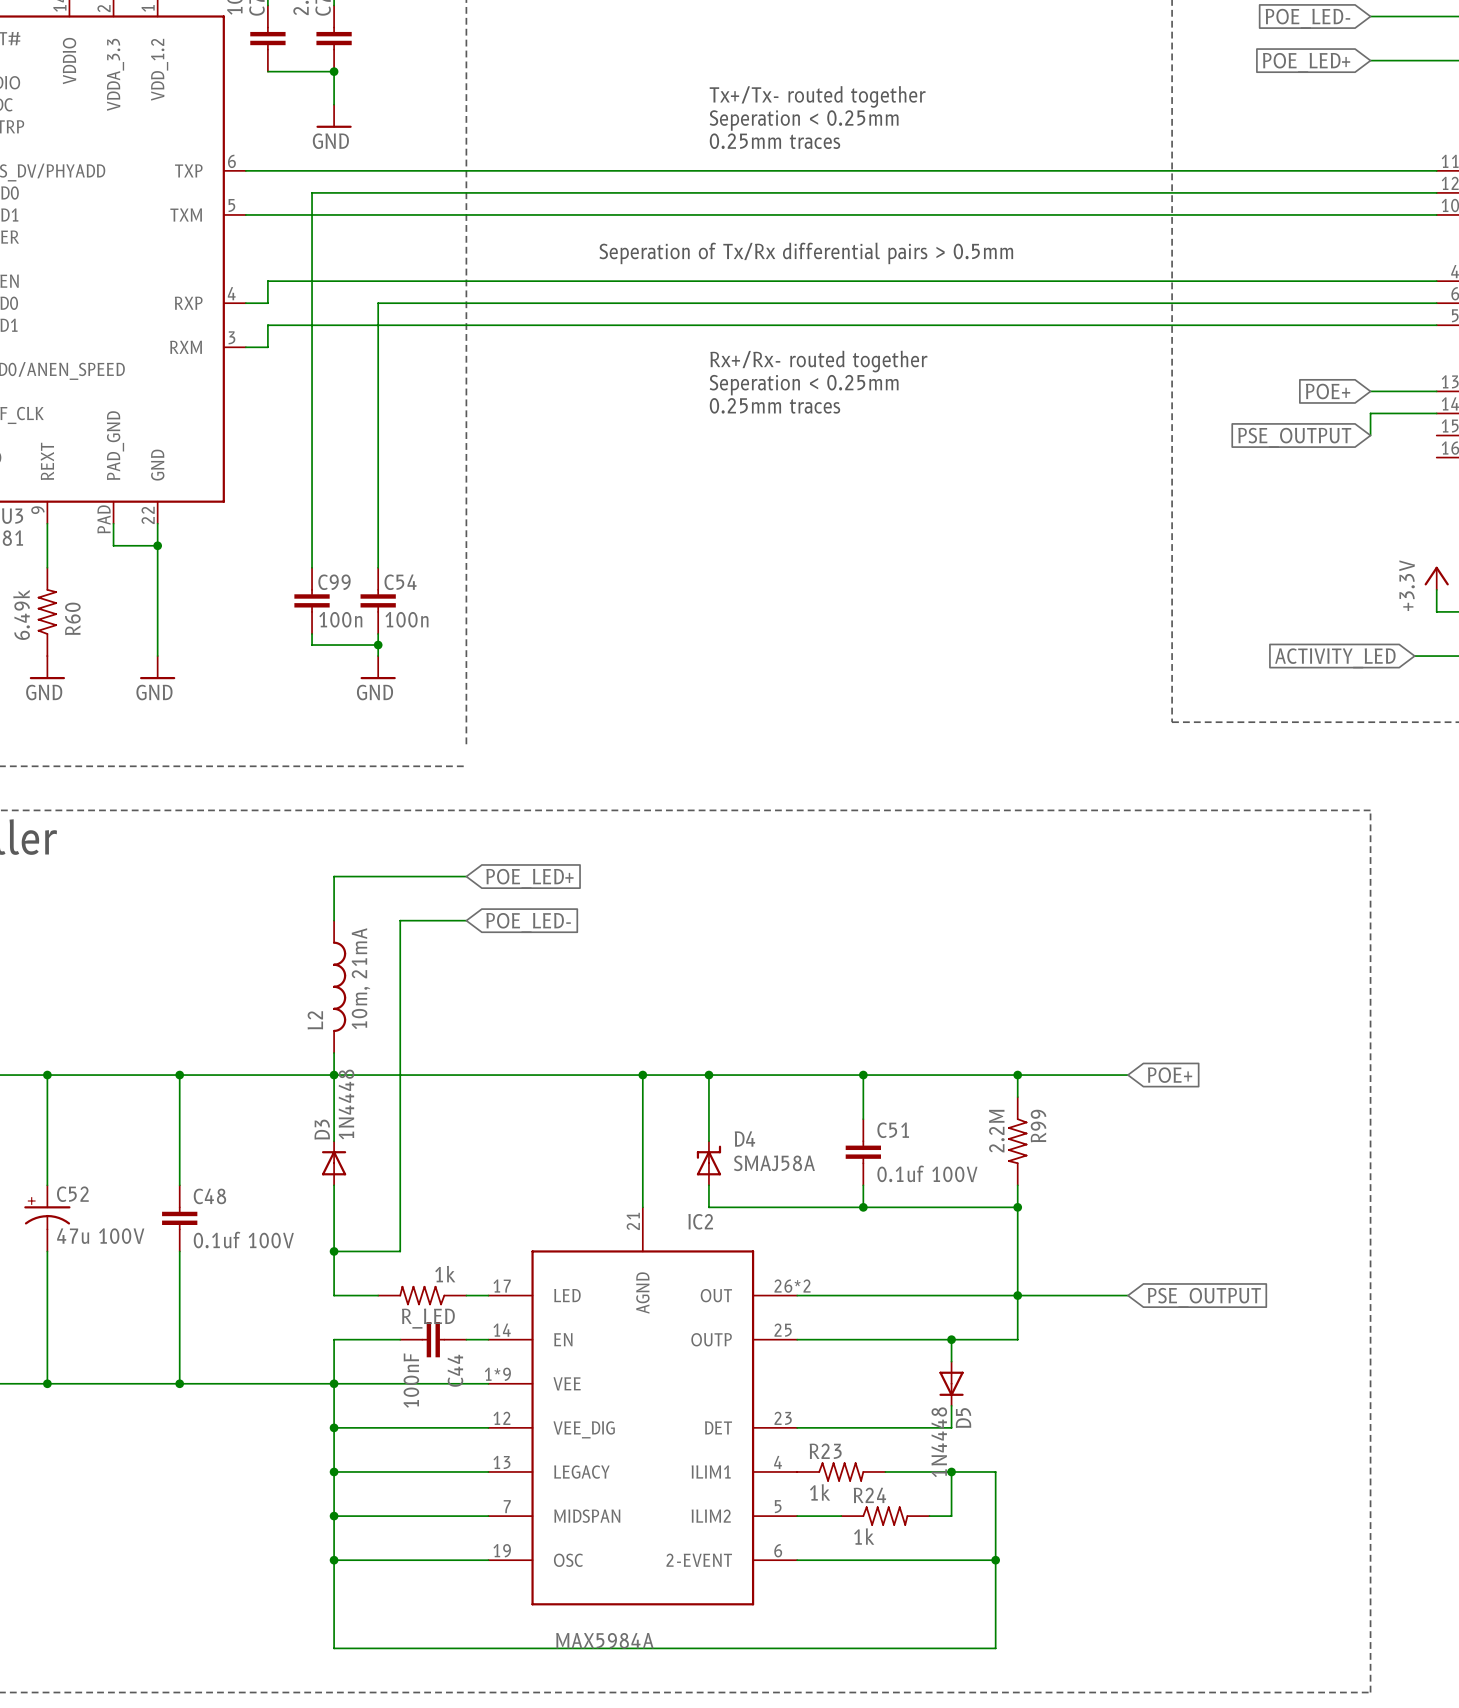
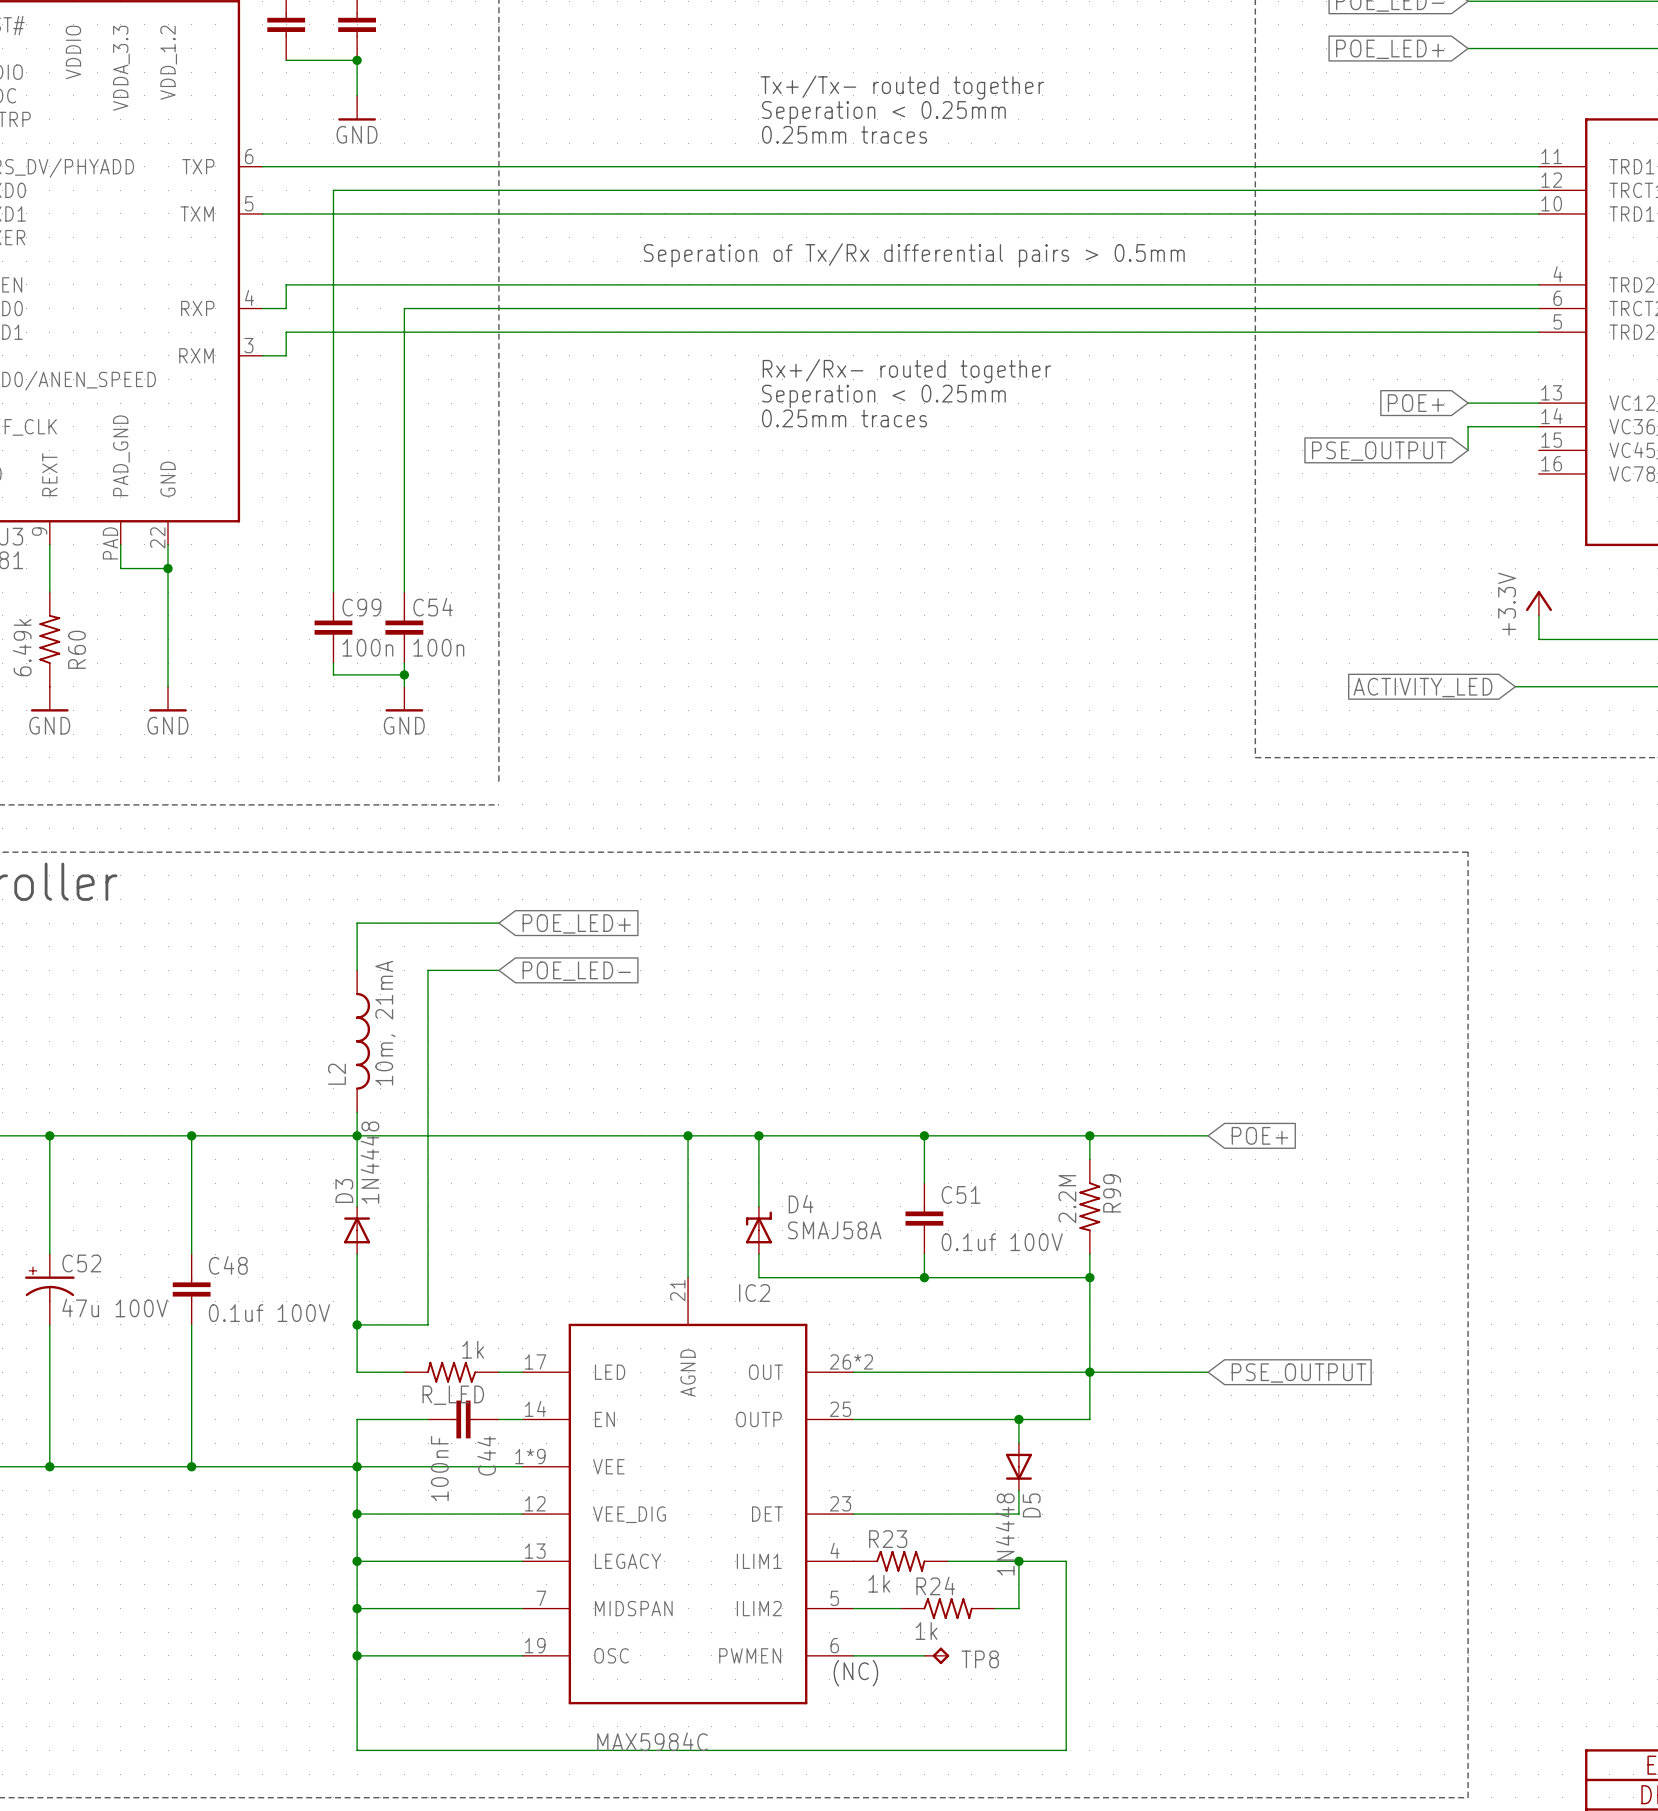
IC2 pin name: 2-EVENT (699, 1560) -> PWMEN (750, 1655)
wire: (863, 1560) (995, 1560) -> none
TP8: none -> (936, 1655)
junction: (995, 1560) -> none
text: none -> (NC) (855, 1673)
IC2 value: MAX5984A (604, 1640) -> MAX5984C (652, 1741)

